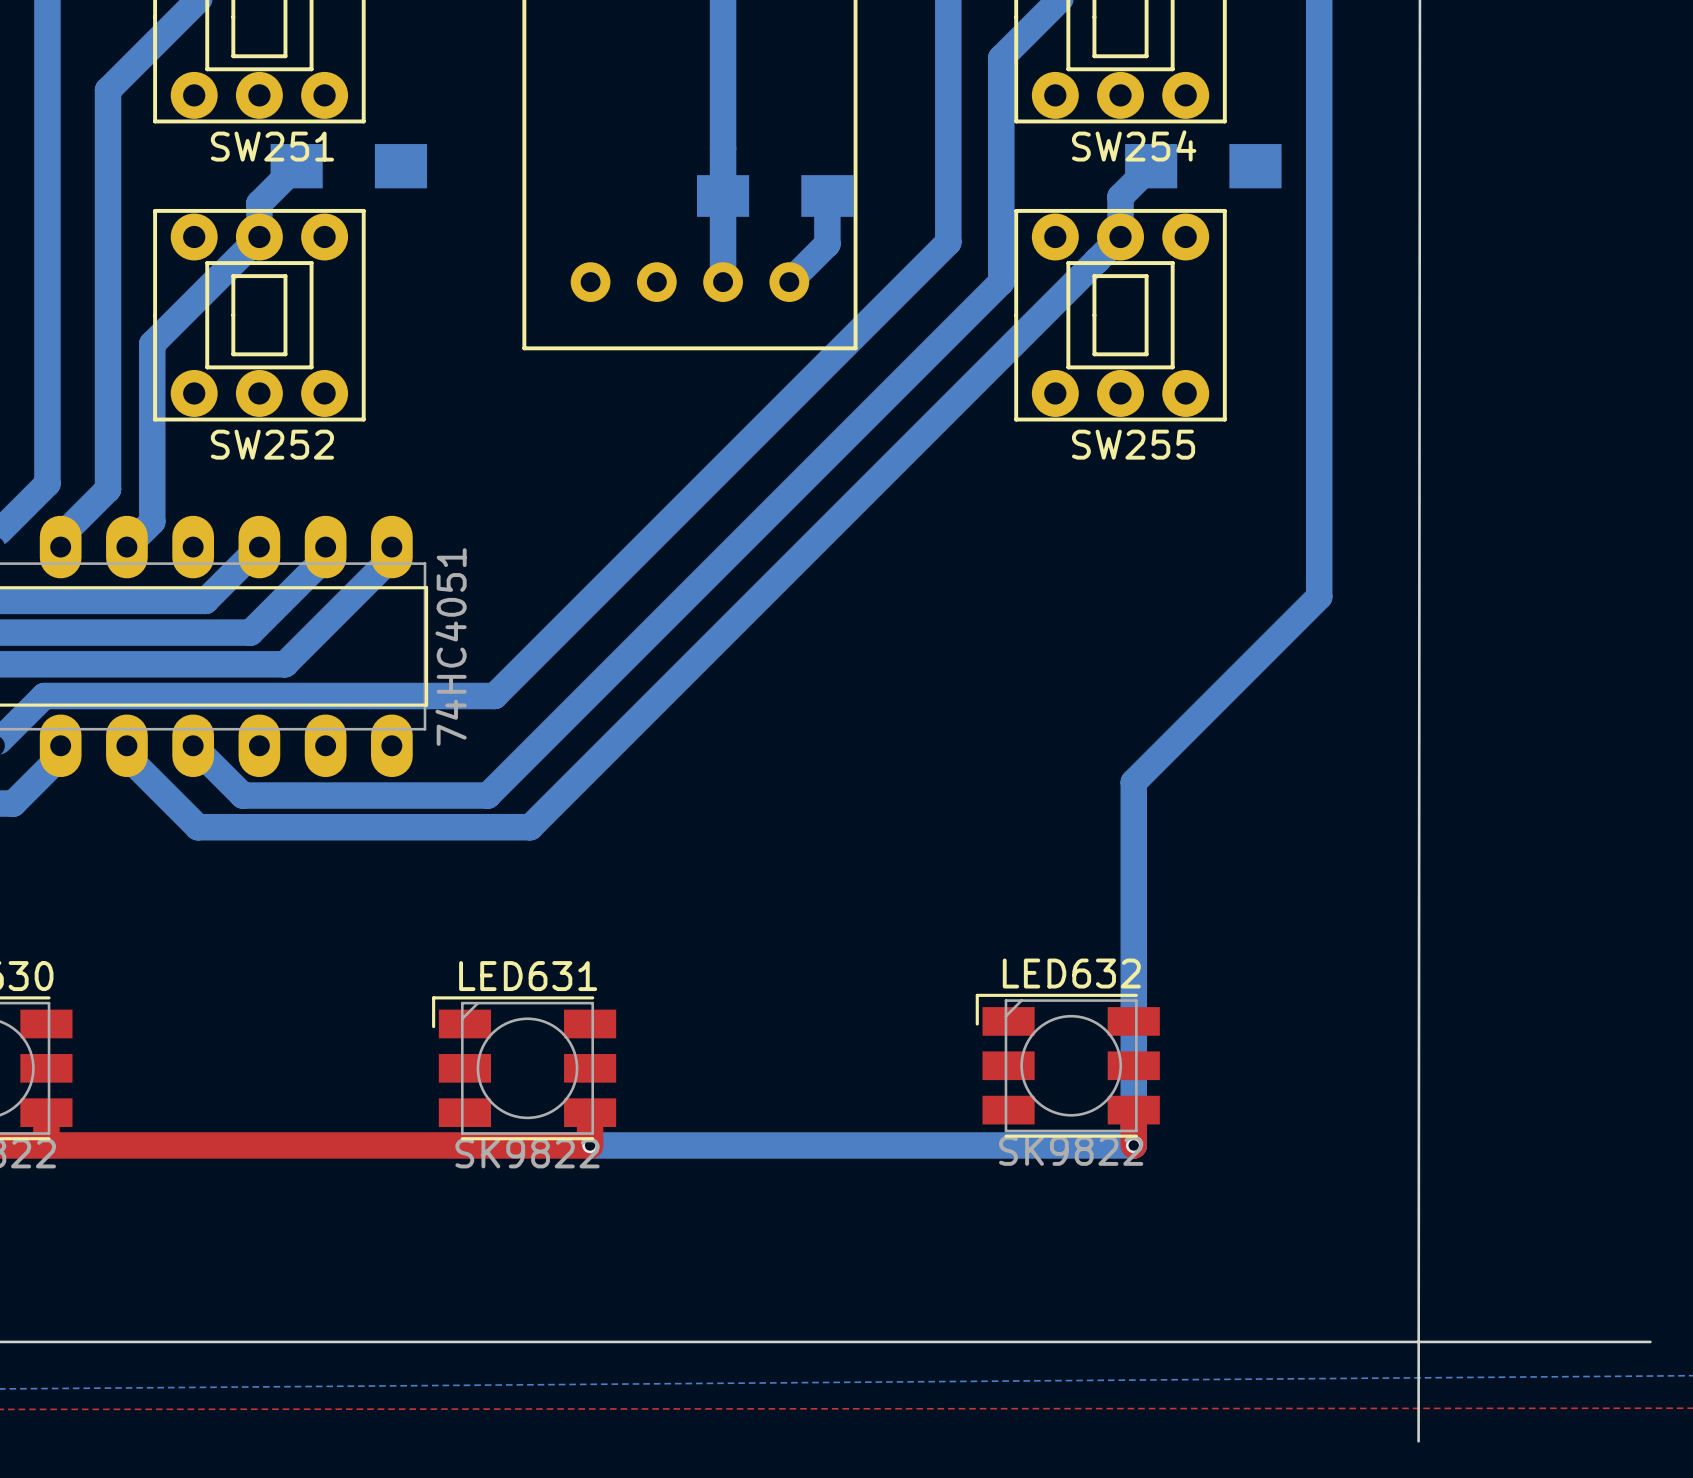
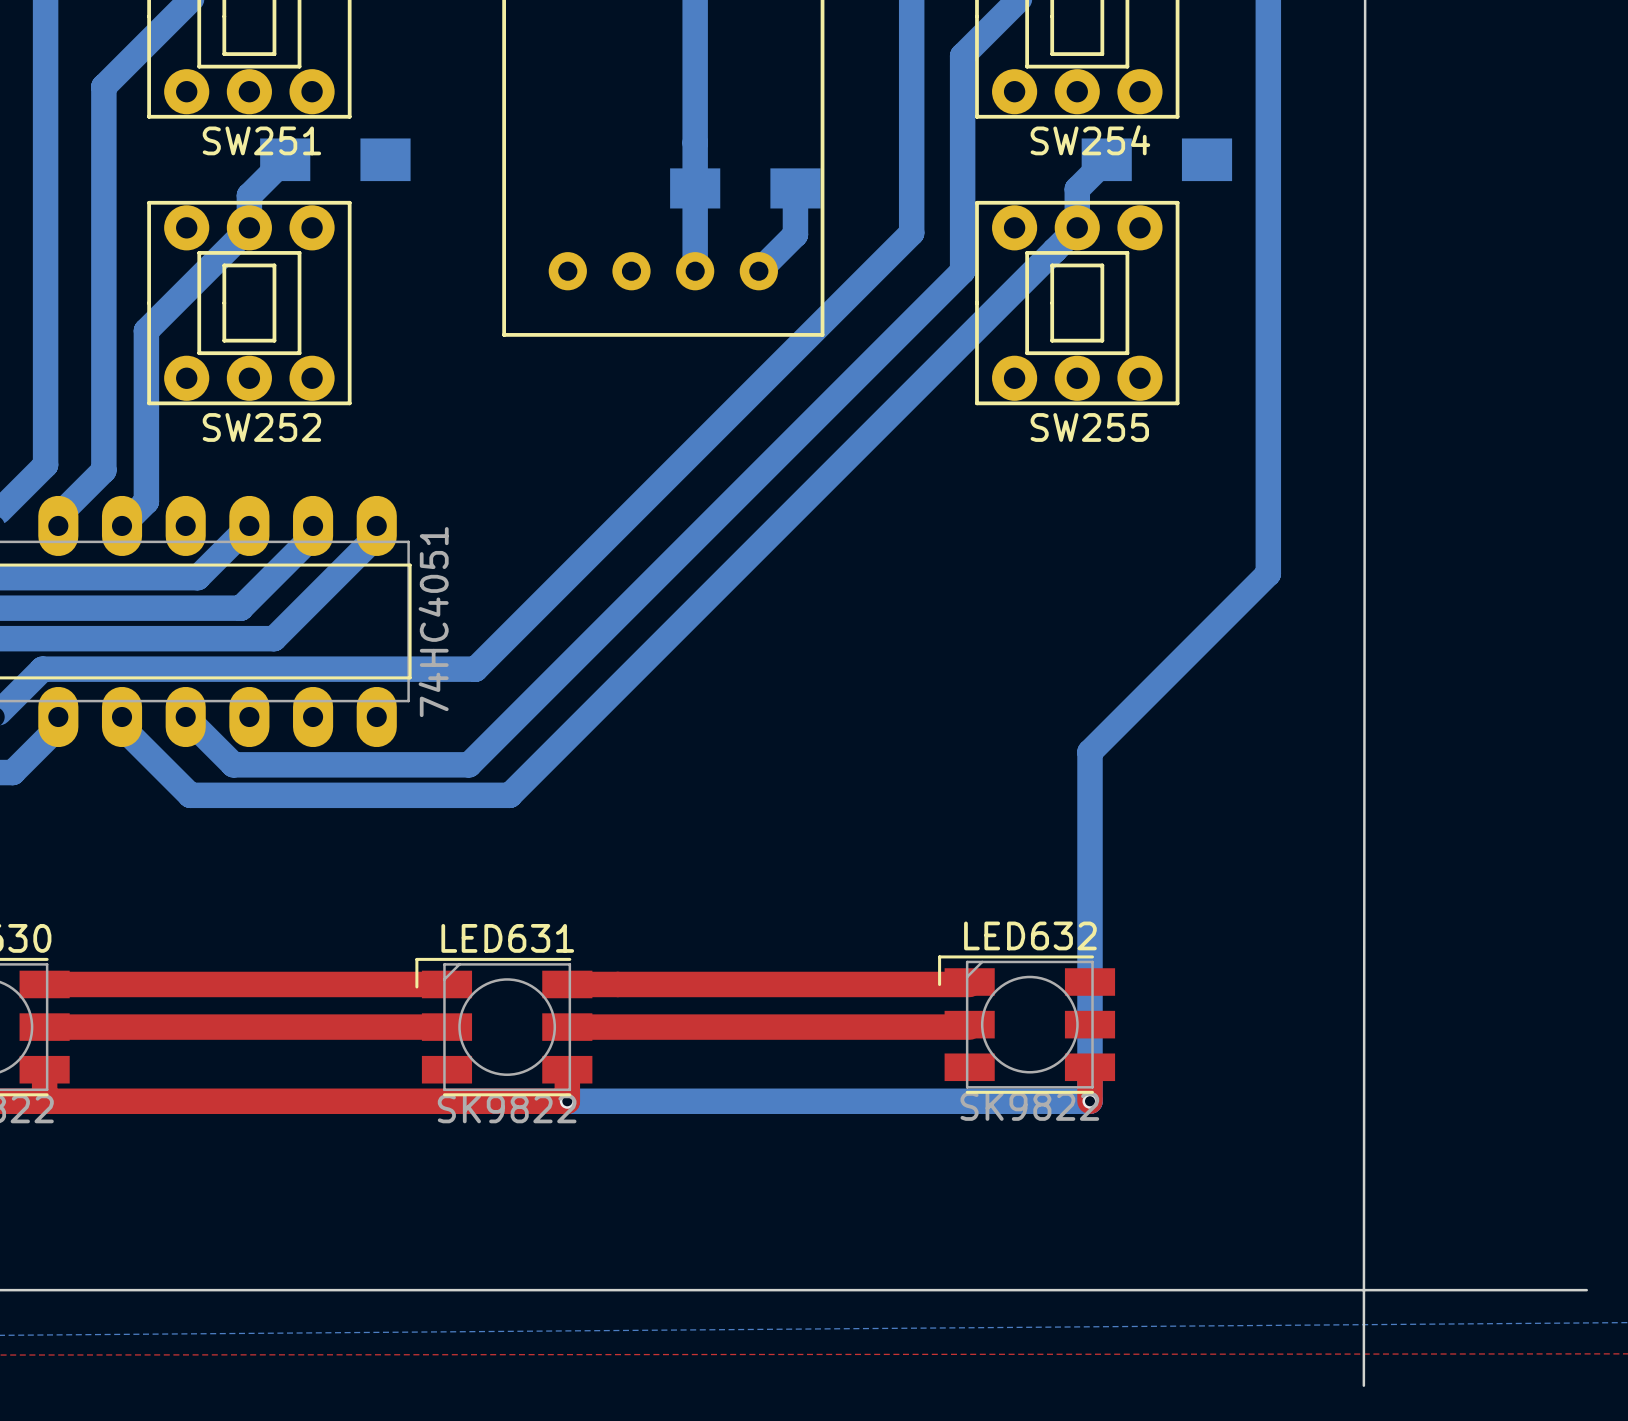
top track: none -> (44, 984) (446, 984)
top track: none -> (567, 984) (969, 984)
top track: none -> (44, 1027) (446, 1027)
top track: none -> (567, 1027) (969, 1027)

